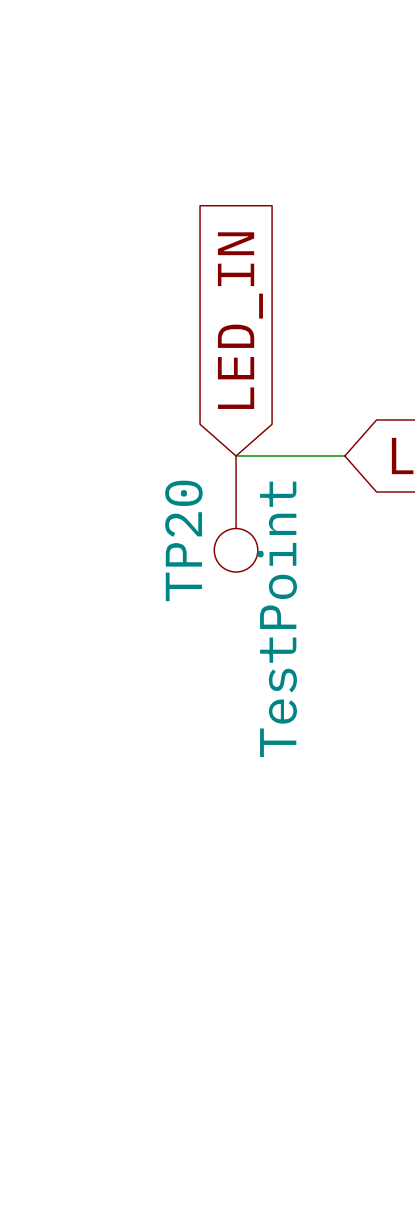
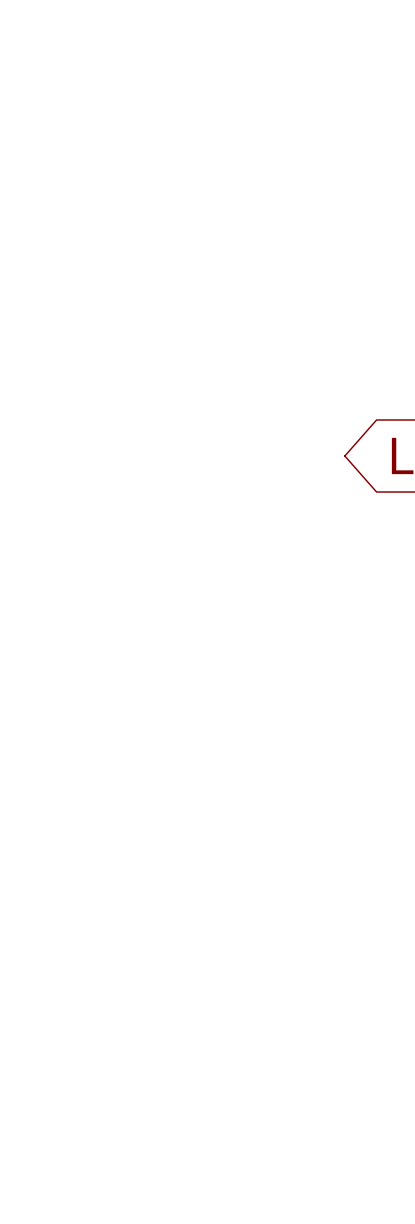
global label: LED_IN (240, 320) -> none
wire: (236, 456) (344, 456) -> none
TP20: TestPoint (236, 514) -> none

